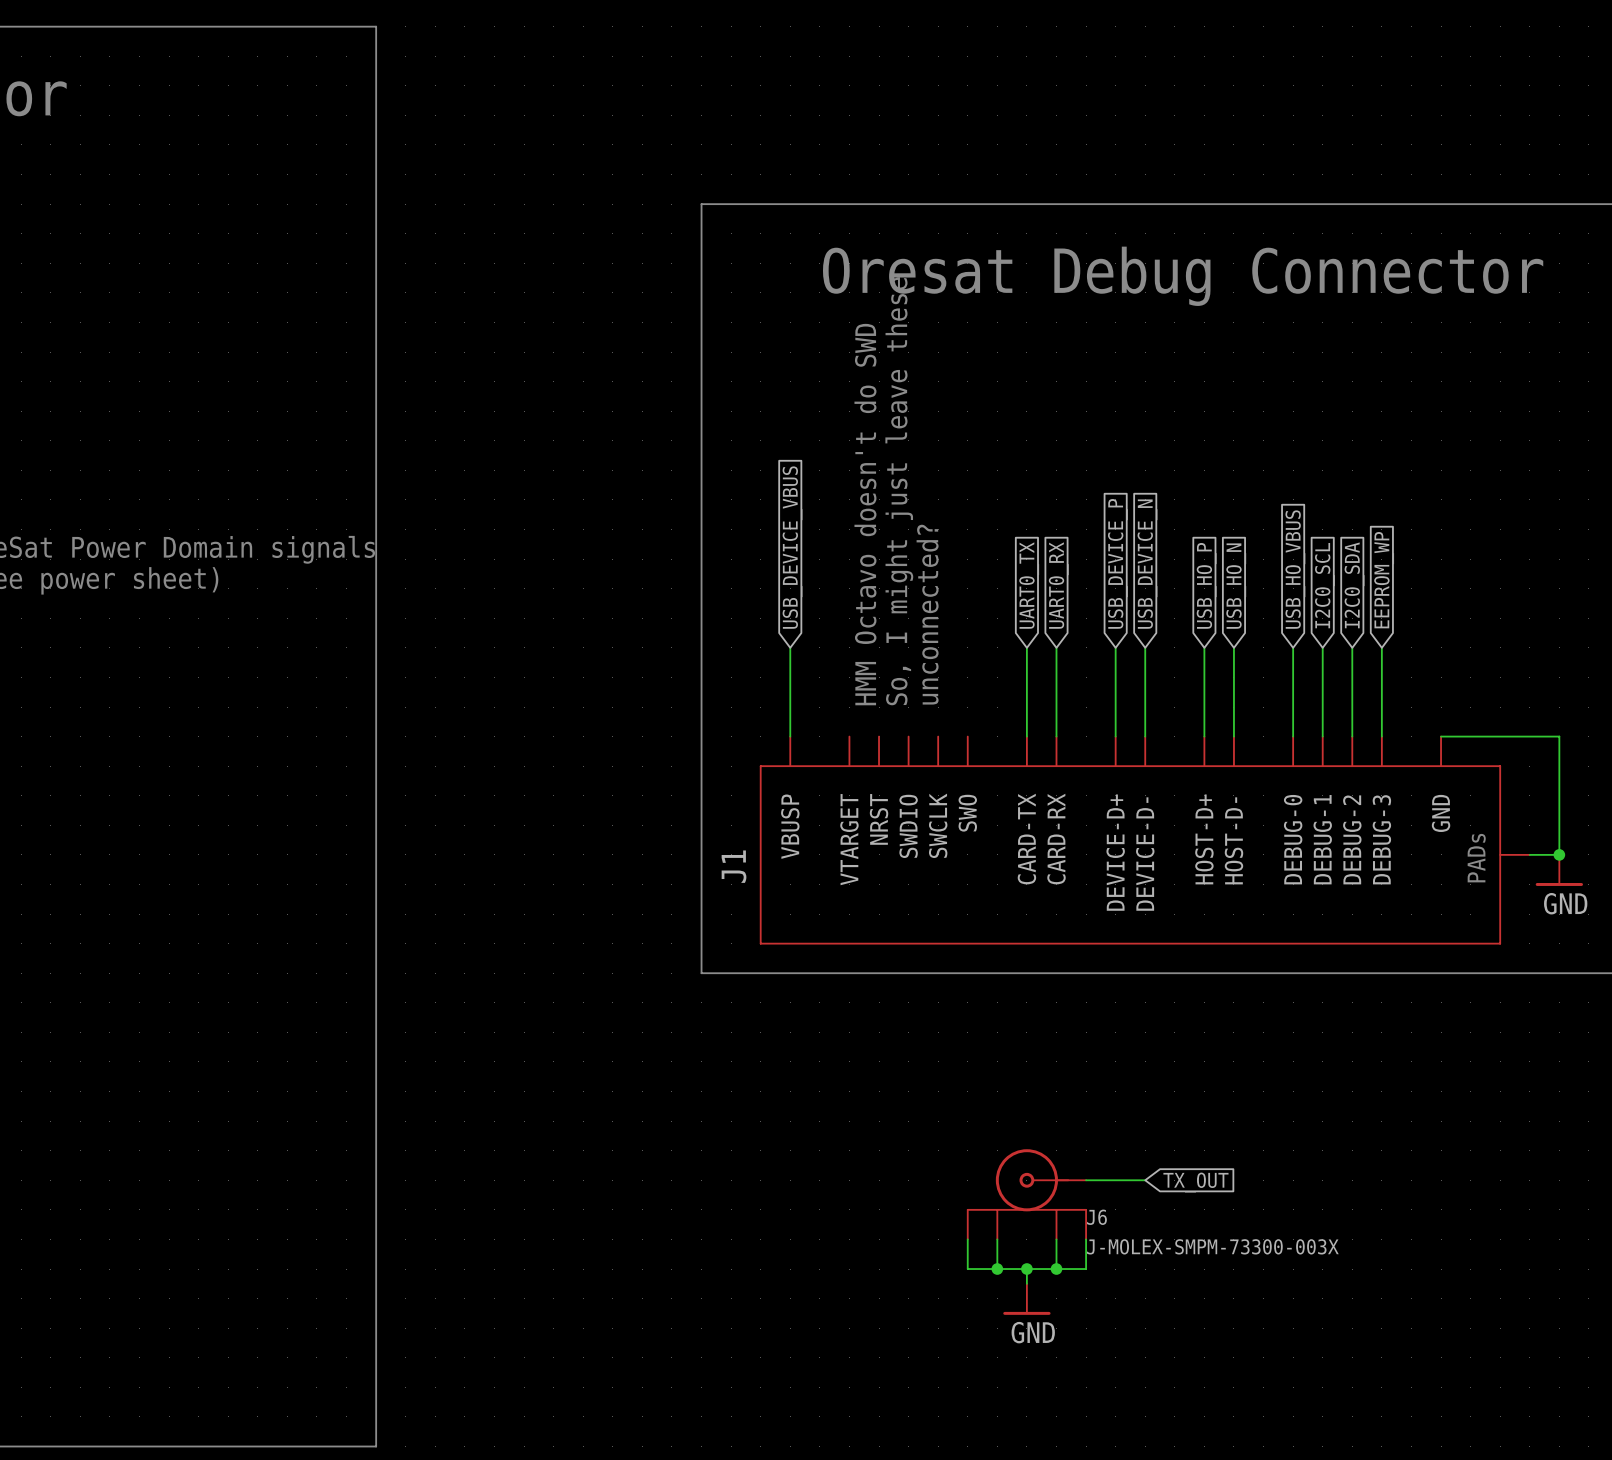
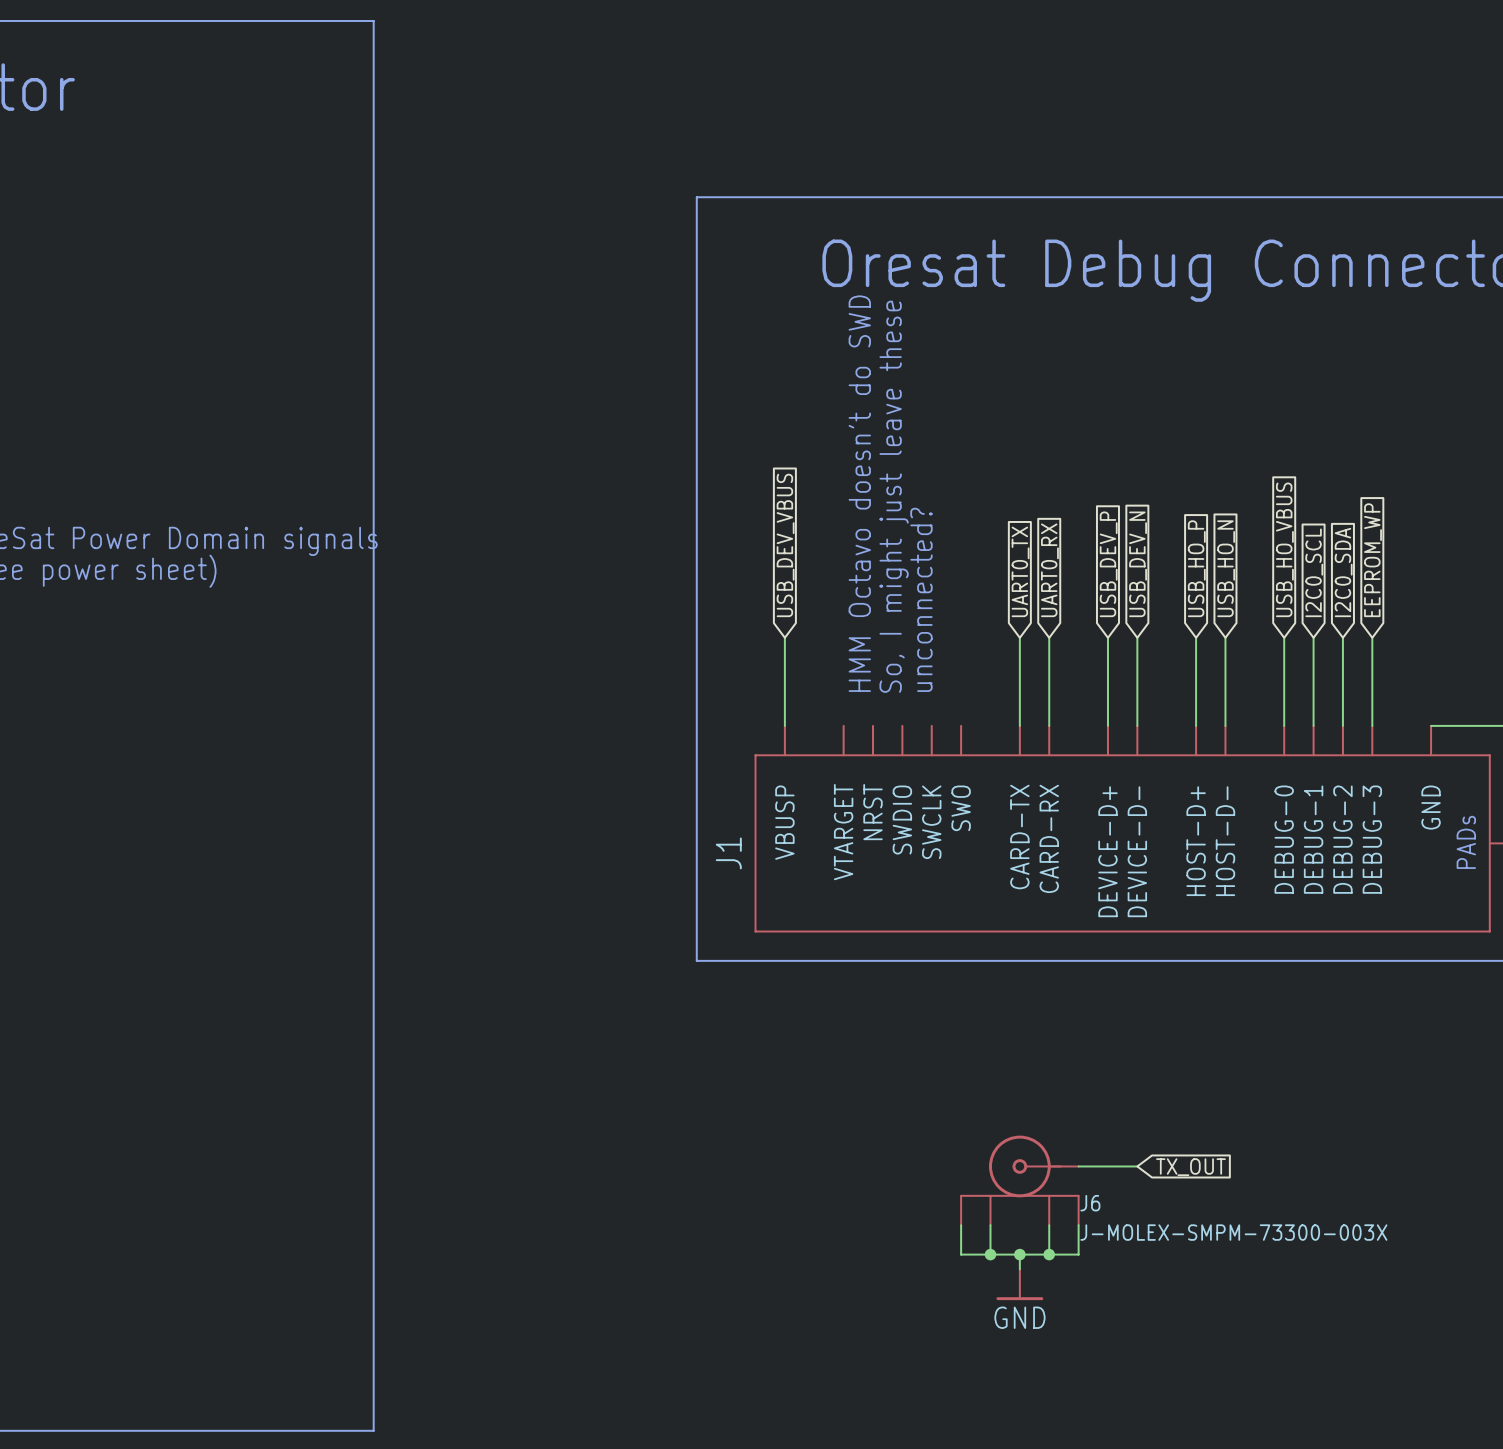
global label: USB_DEVICE_VBUS (792, 547) -> USB_DEV_VBUS (785, 545)
global label: USB_DEVICE_P (1117, 563) -> USB_DEV_P (1108, 564)
global label: USB_DEVICE_N (1147, 564) -> USB_DEV_N (1138, 564)

